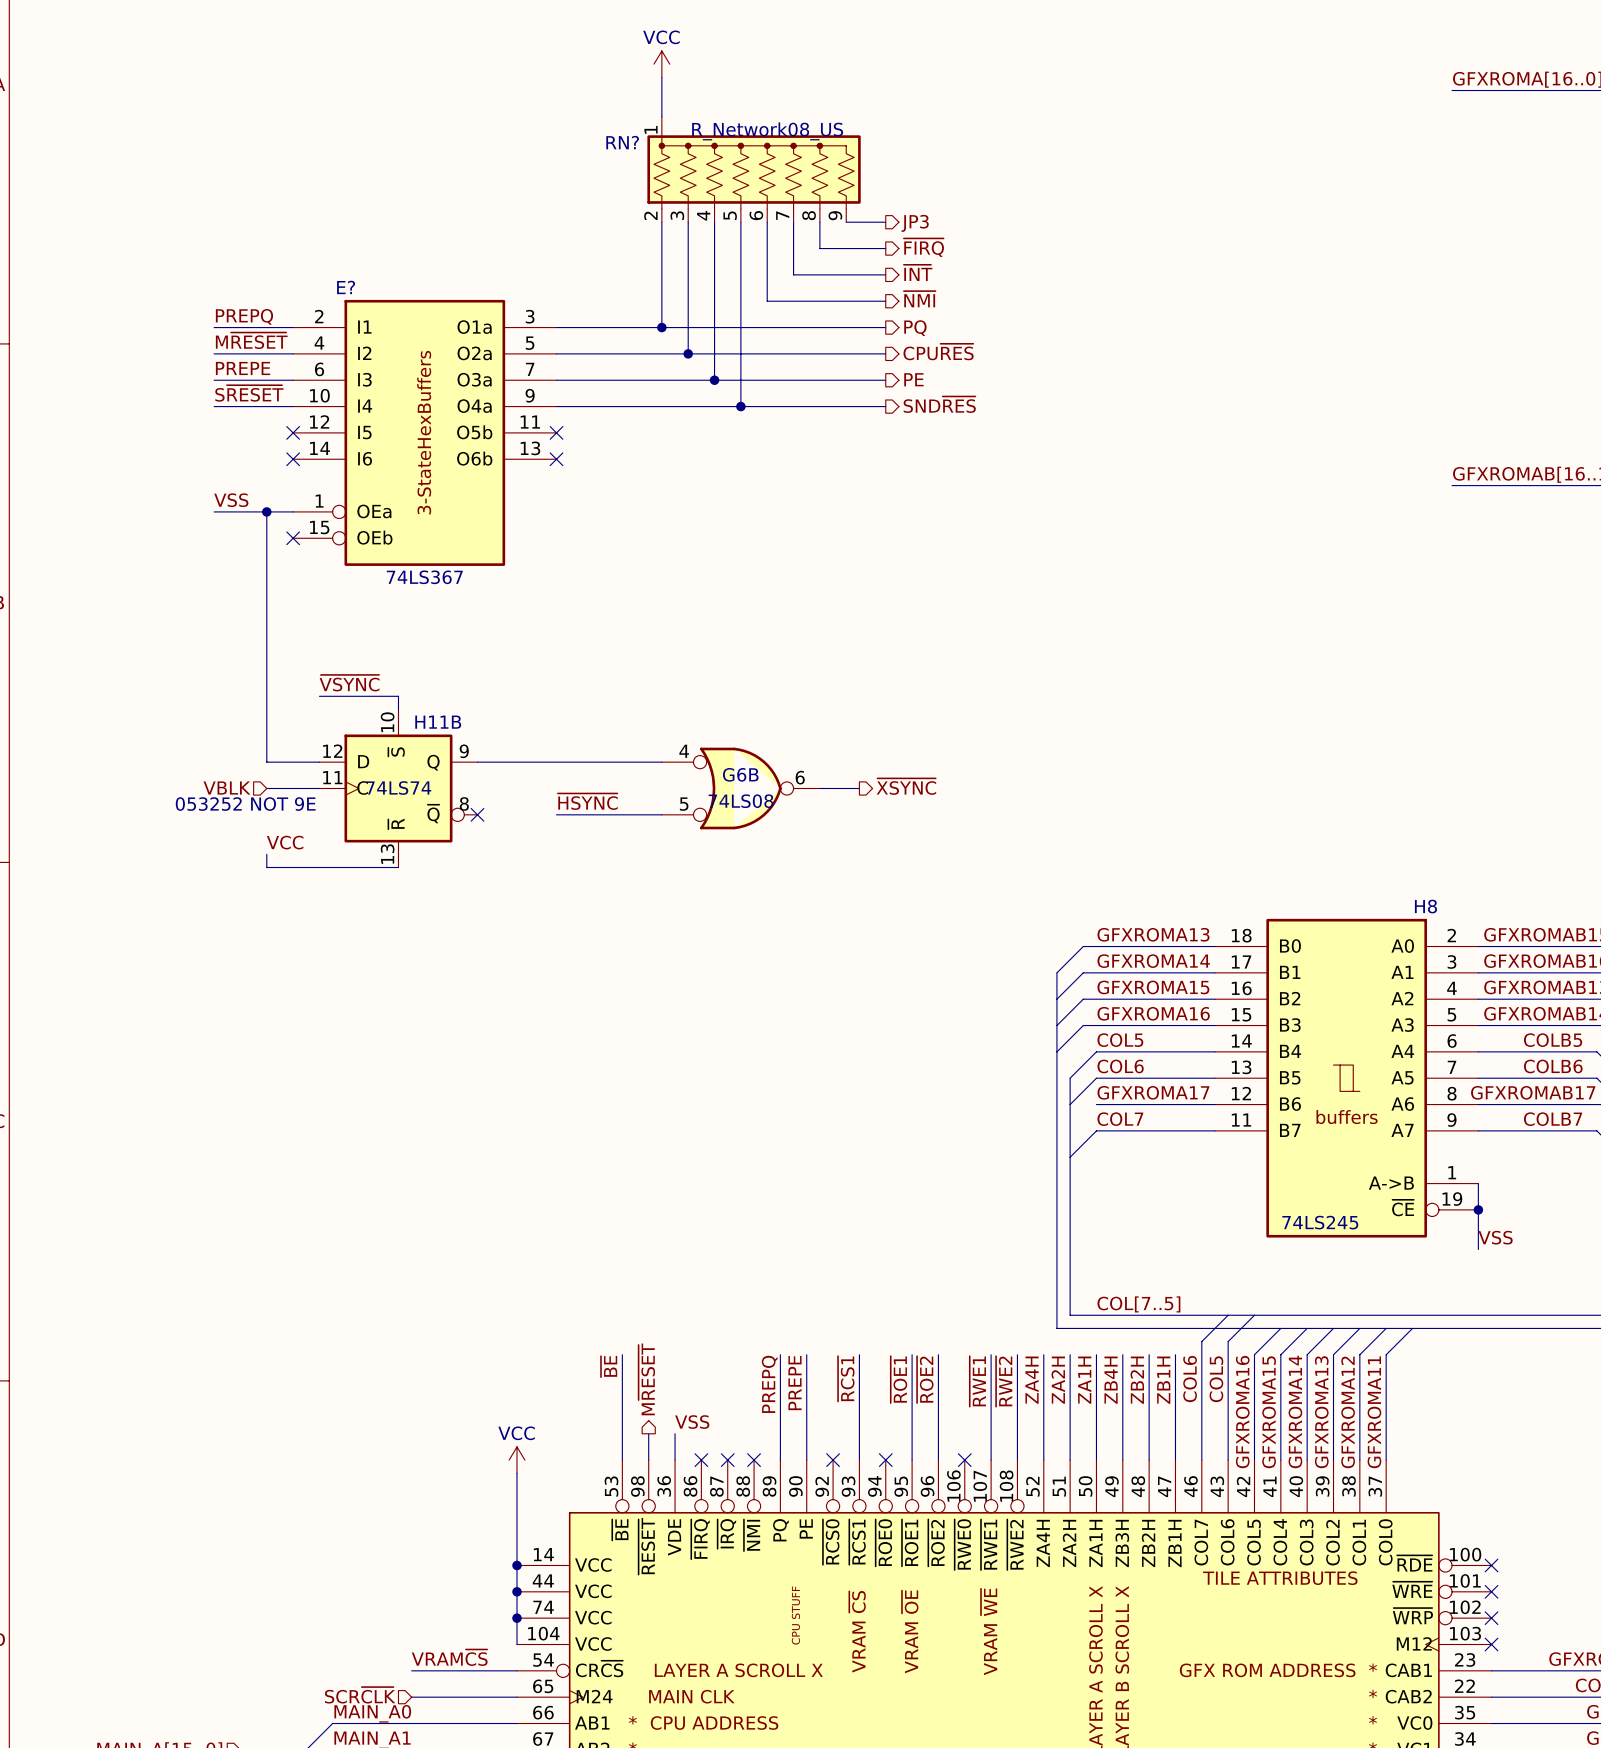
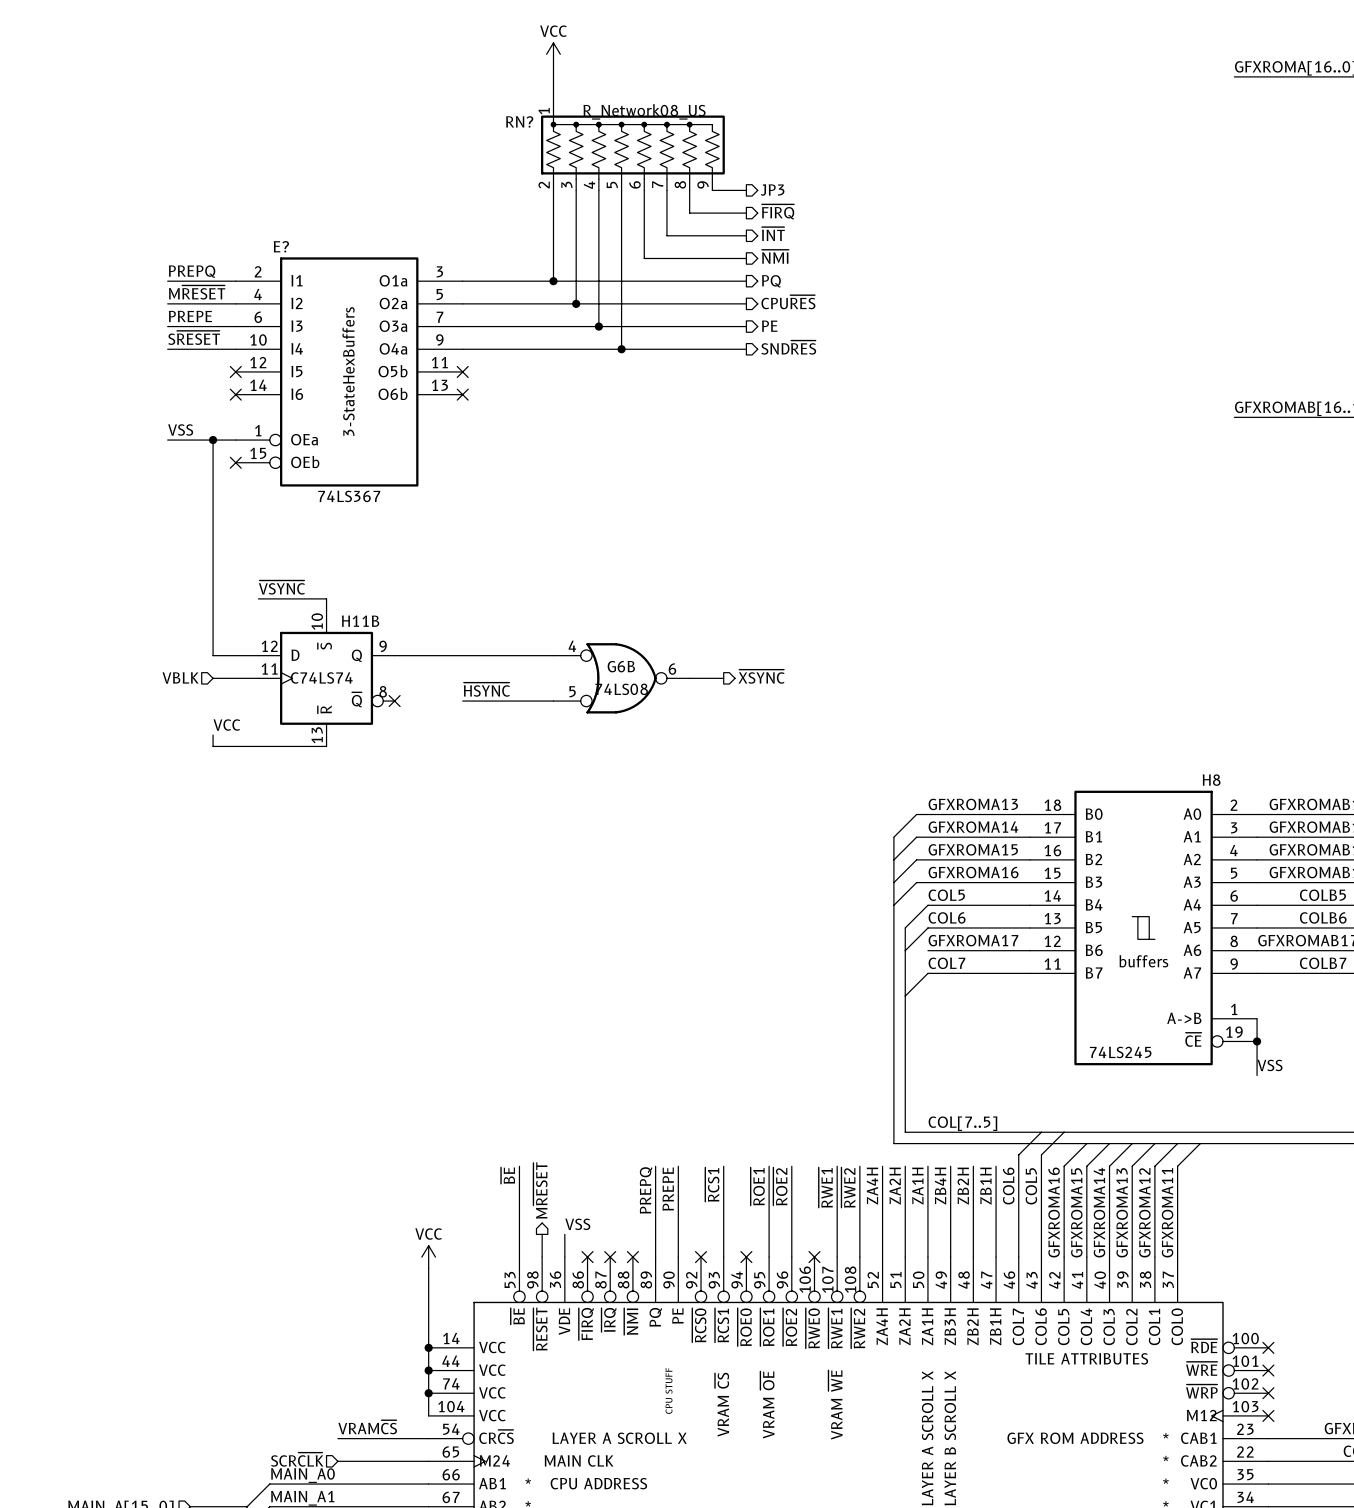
text: 053252 NOT 9E (245, 804) -> none

